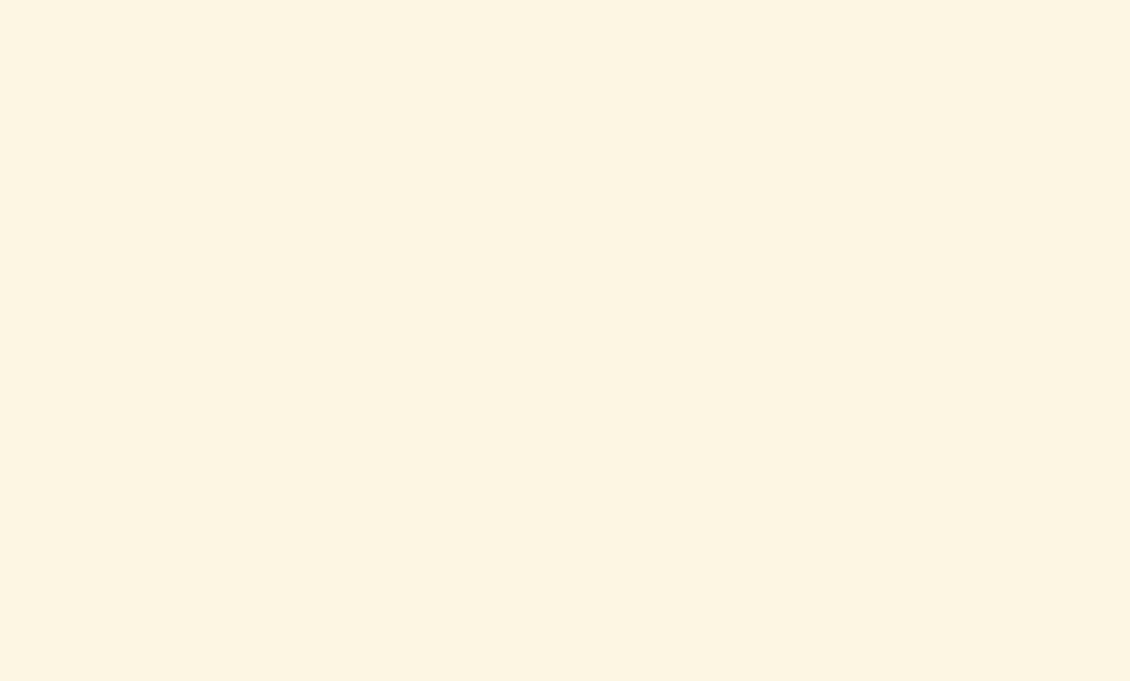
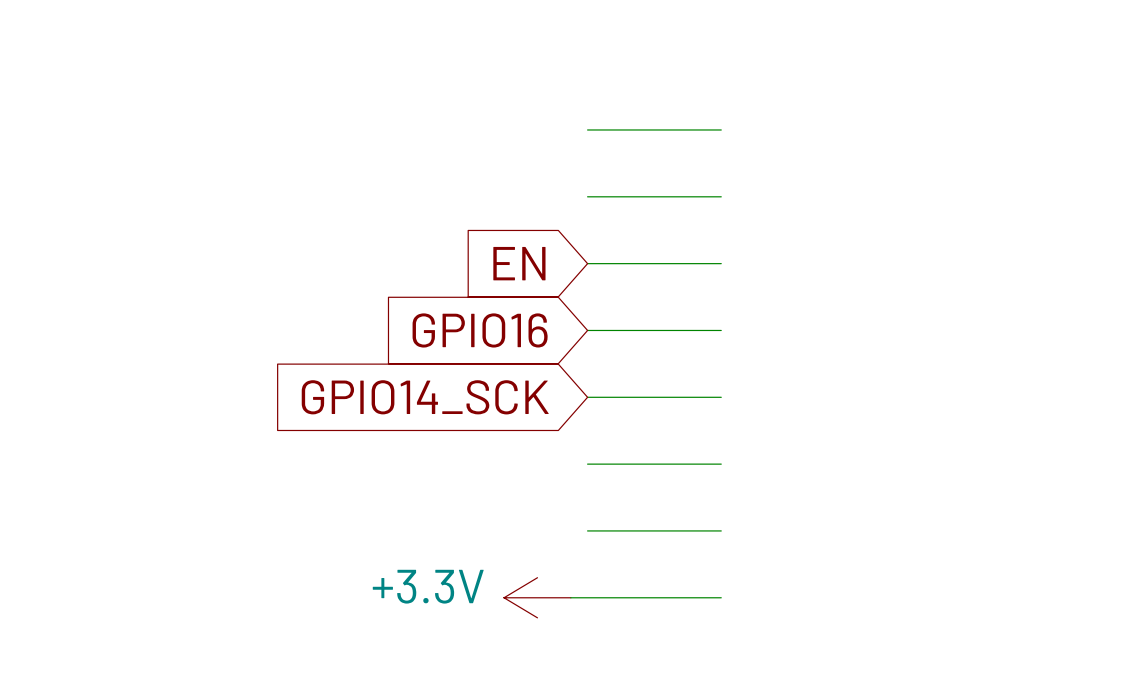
wire: none -> (587, 129) (721, 129)
wire: none -> (587, 196) (721, 196)
global label: none -> EN (519, 263)
wire: none -> (587, 263) (721, 263)
global label: none -> GPIO16 (480, 330)
wire: none -> (587, 330) (721, 330)
wire: none -> (587, 397) (721, 397)
global label: none -> GPIO14_SCK (425, 397)
wire: none -> (587, 464) (721, 464)
wire: none -> (587, 530) (721, 530)
power symbol: none -> +3.3V (537, 597)
wire: none -> (570, 597) (721, 597)

